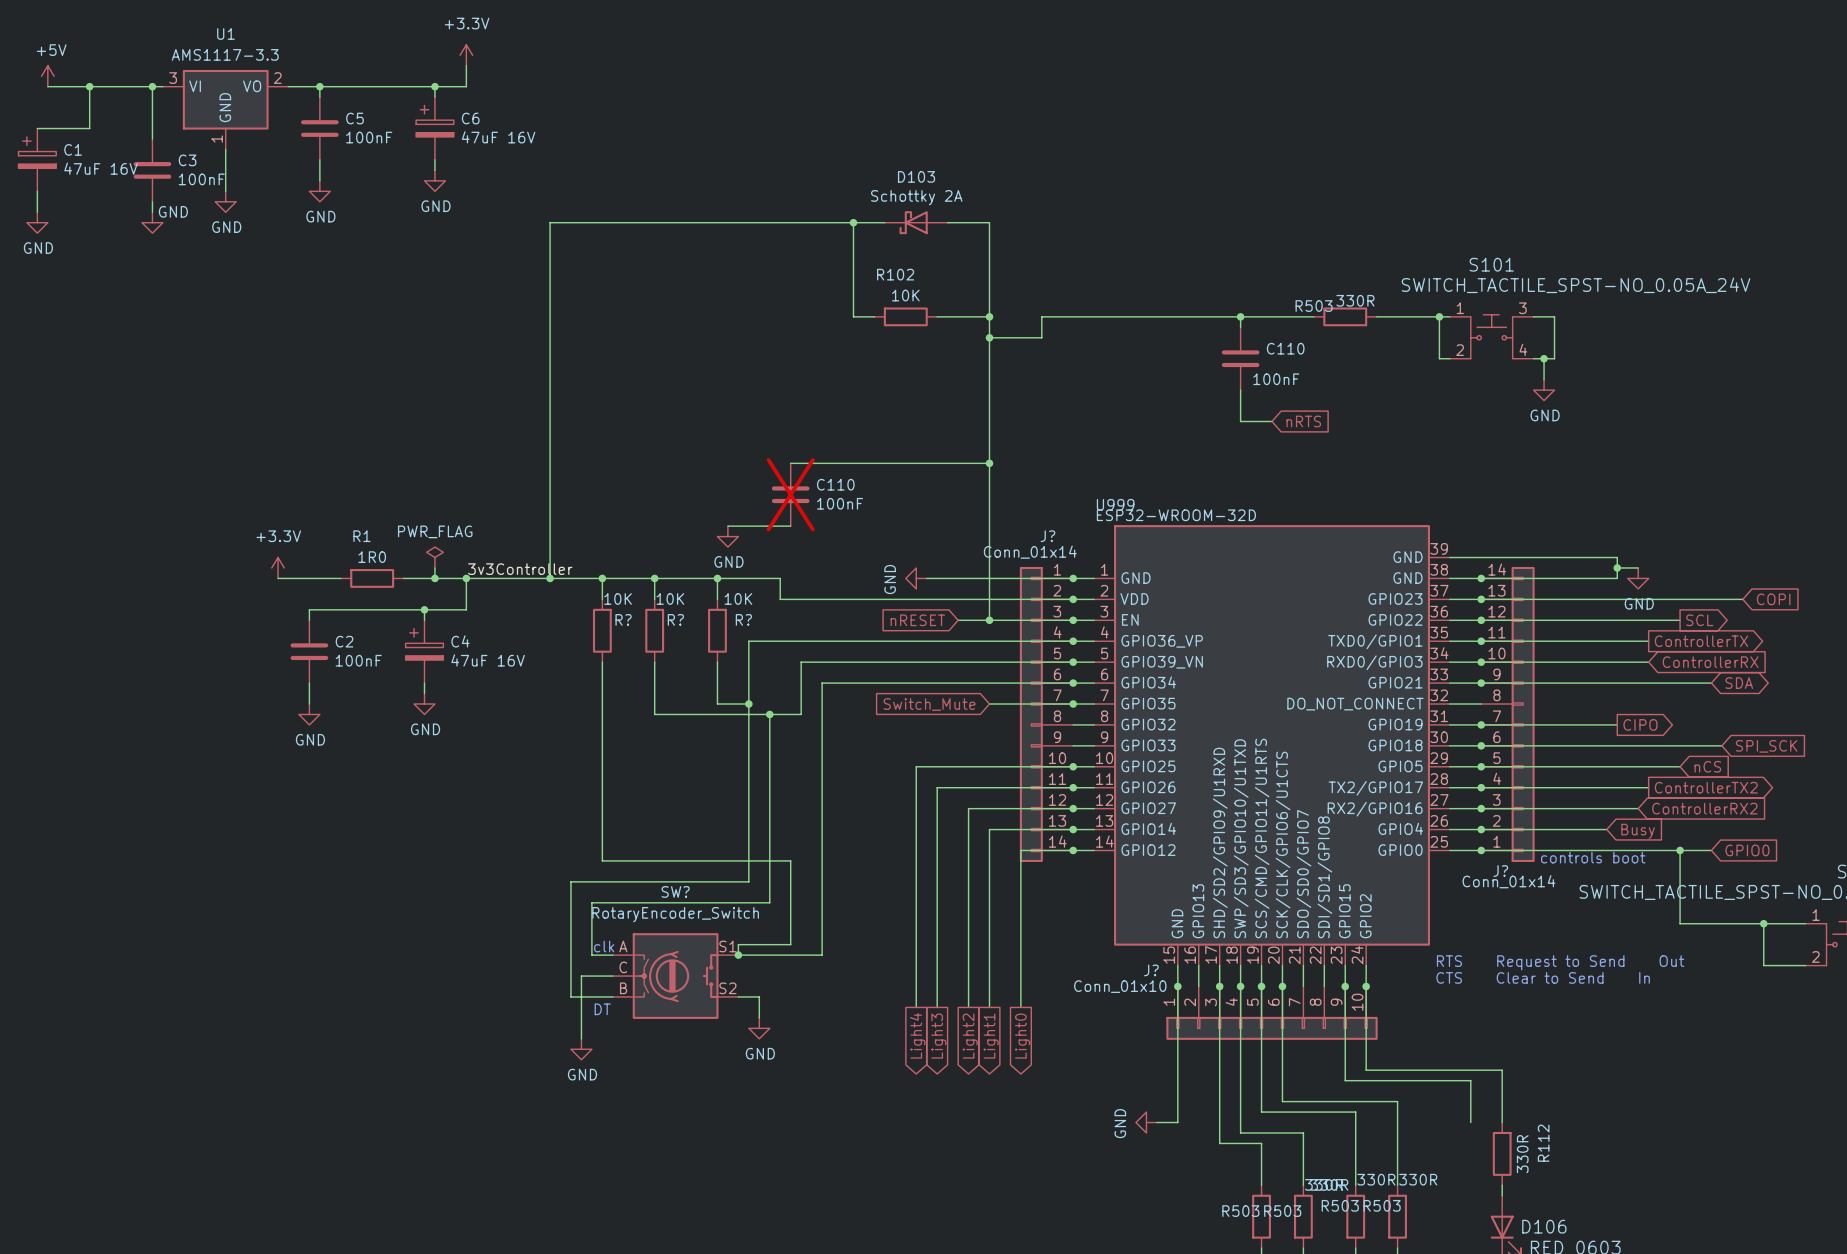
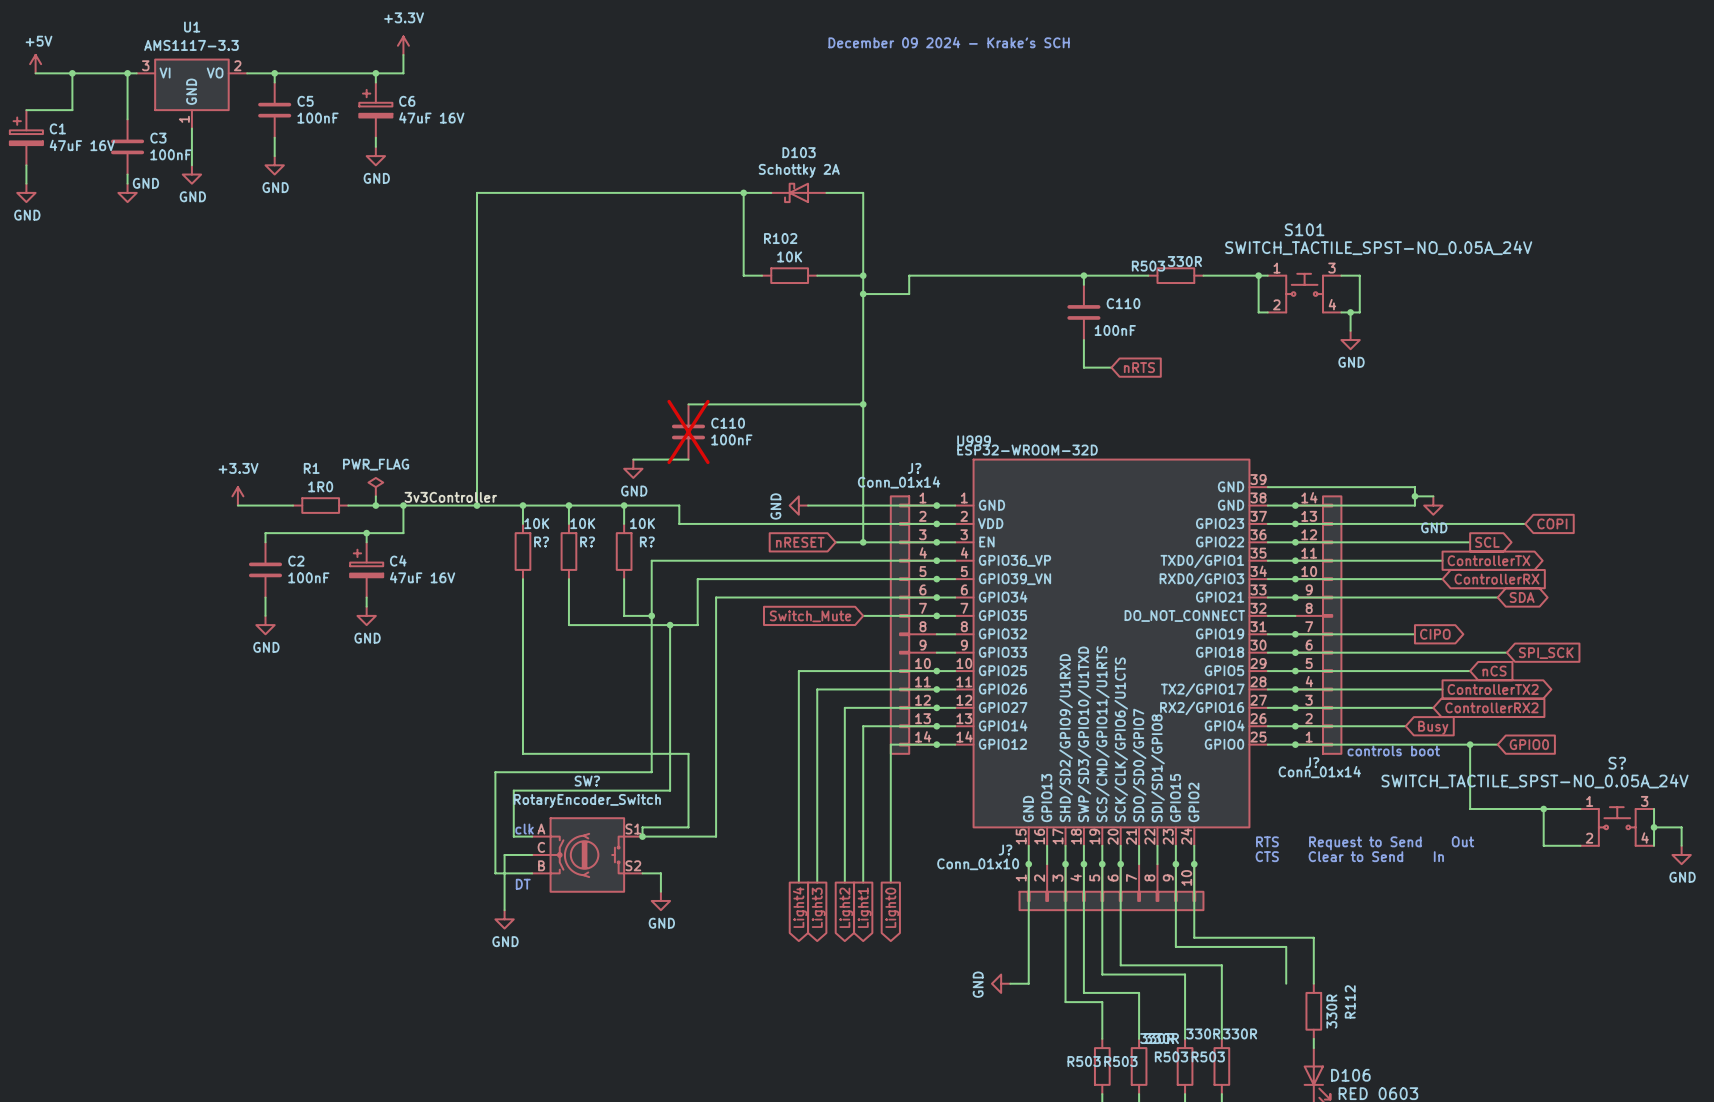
text: none -> December 09 2024 - Krake's SCH (949, 42)

